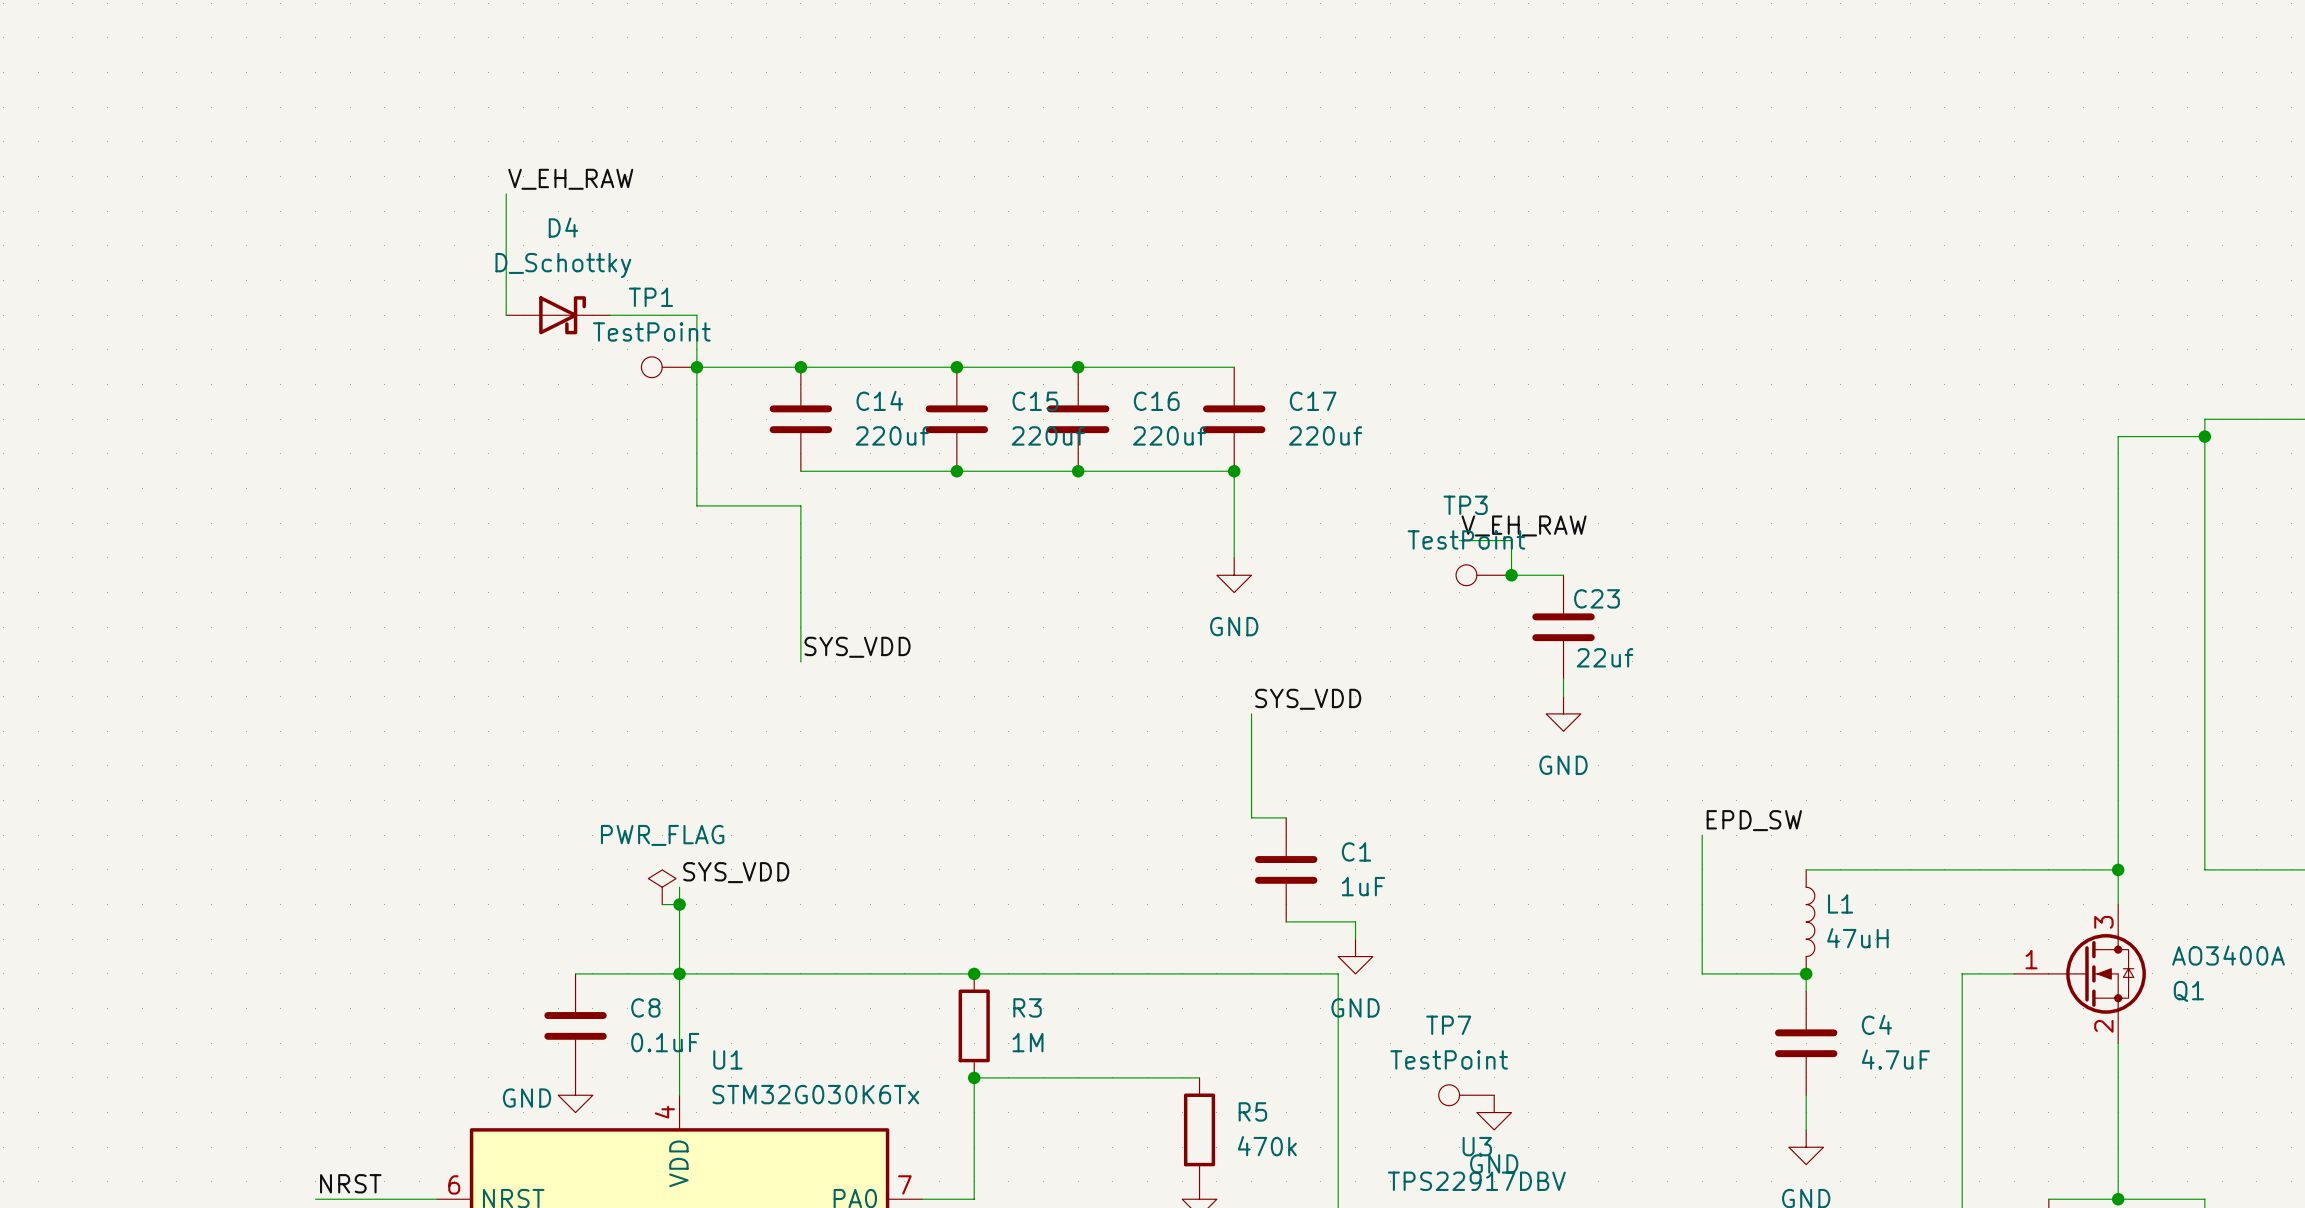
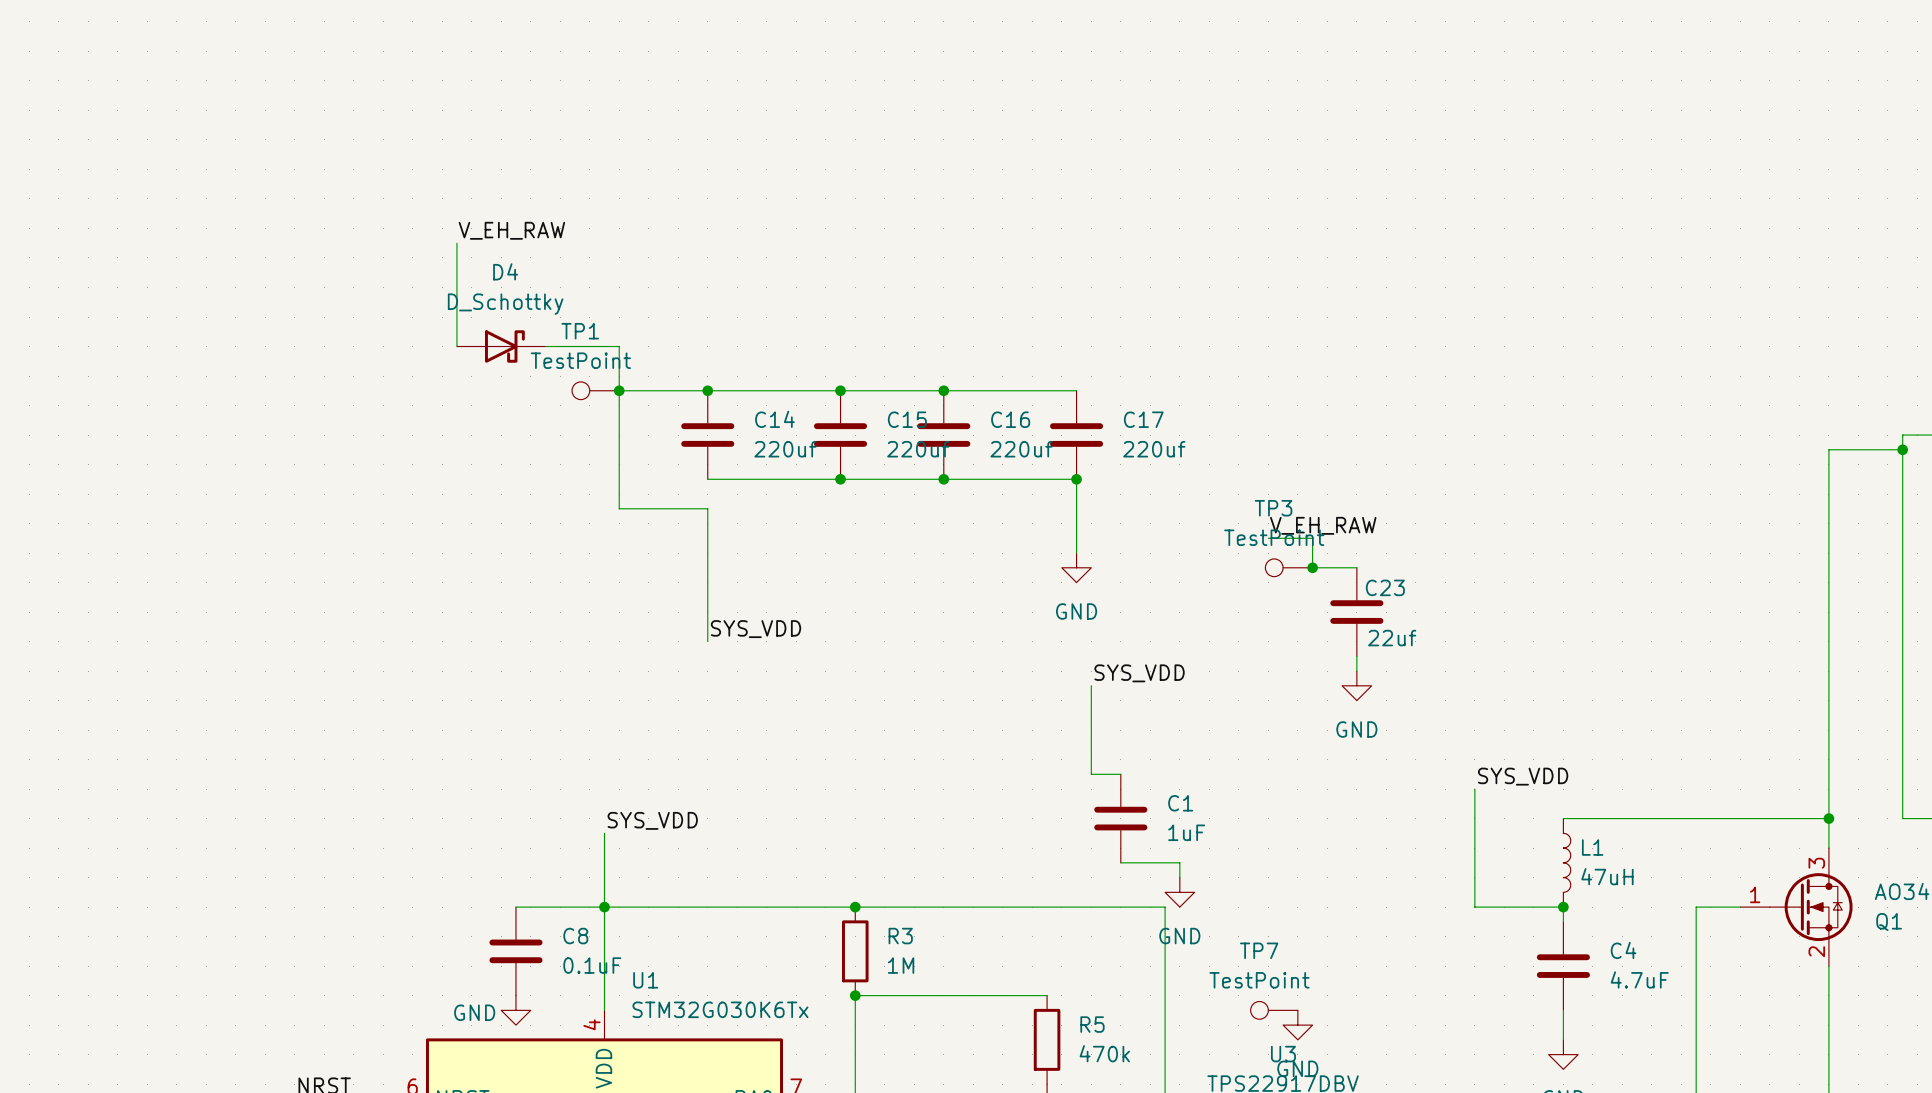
label: EPD_SW (1754, 820) -> SYS_VDD (1523, 776)
power symbol: PWR_FLAG (662, 887) -> none
wire: (662, 904) (679, 904) -> none
junction: (679, 904) -> none

